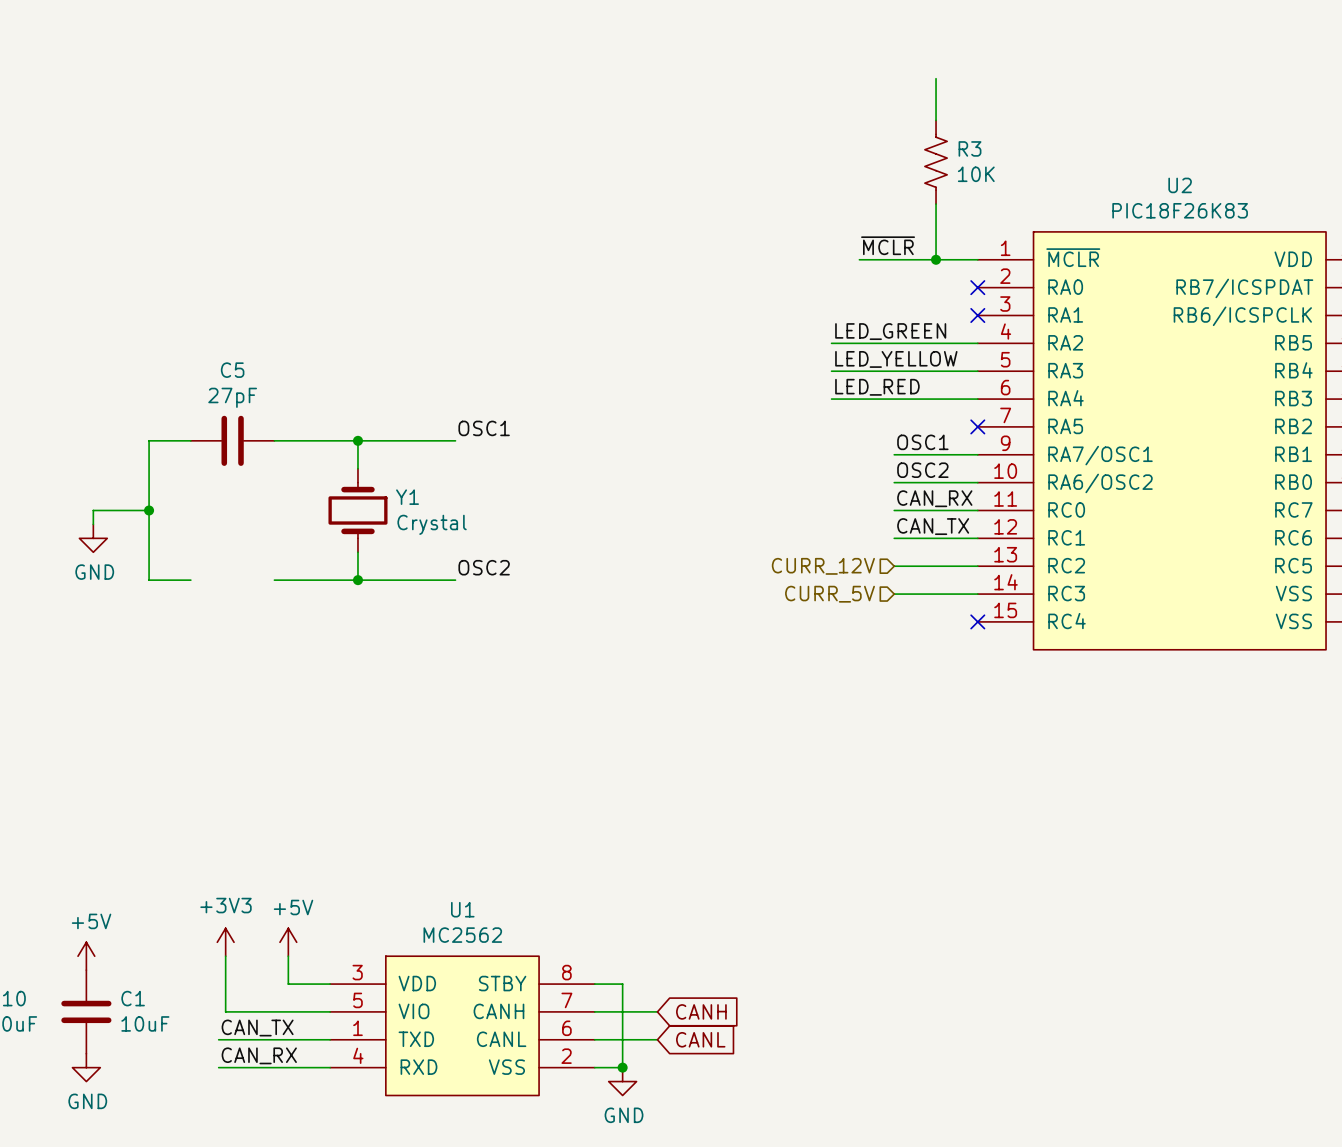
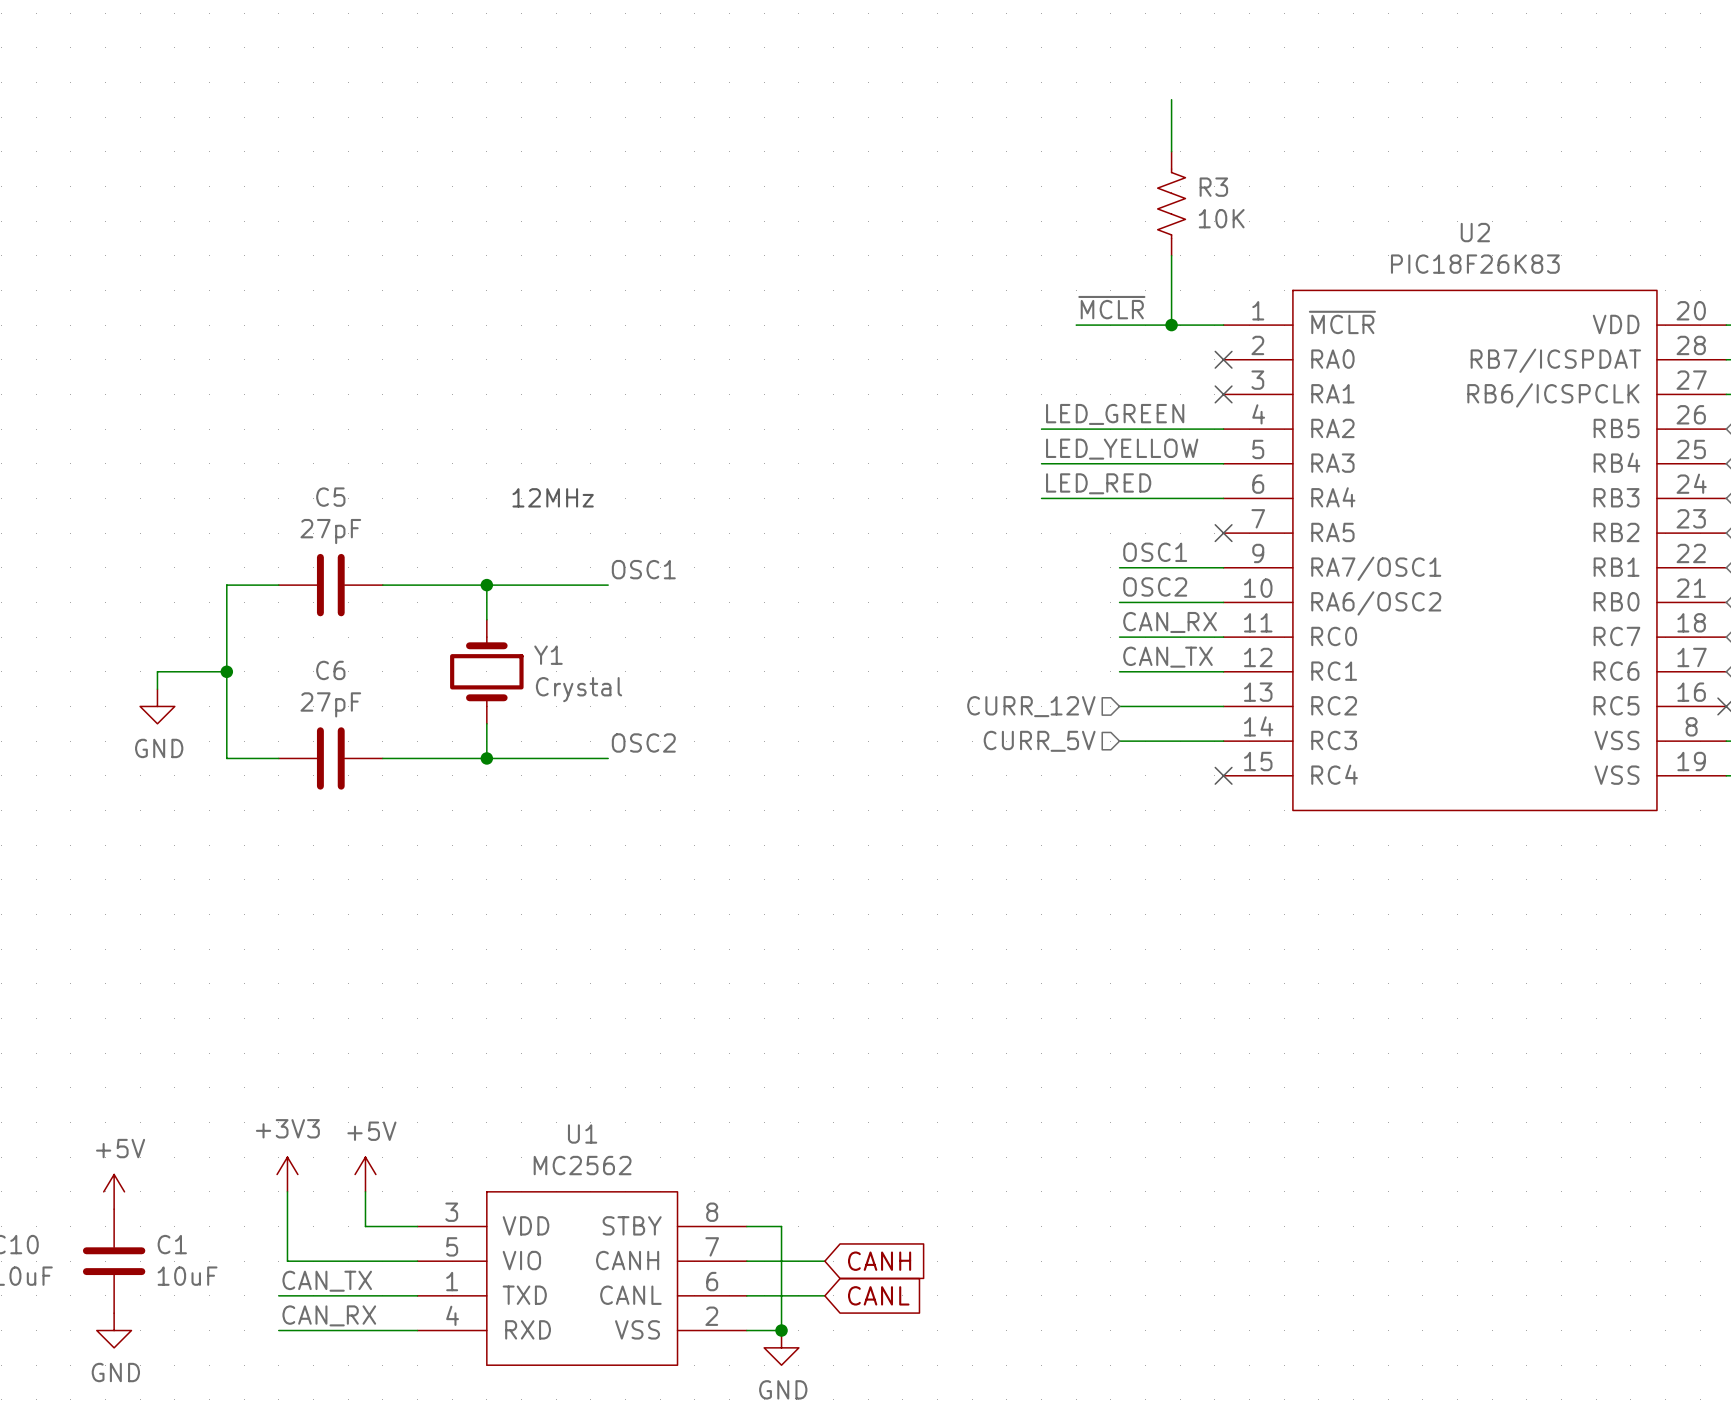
text: none -> 12MHz (553, 497)
label position: OSC1 (484, 428) -> OSC1 (643, 569)
wire: (190, 440) (149, 440) (149, 580) (190, 580) -> (278, 585) (226, 585) (226, 758) (278, 758)
C5 position: (232, 440) -> (330, 585)
wire: (274, 440) (455, 440) -> (382, 585) (608, 585)
wire: (357, 440) (357, 468) -> (486, 585) (486, 619)
junction position: (357, 440) -> (486, 585)
wire: (149, 510) (93, 510) (93, 524) -> (226, 671) (157, 671) (157, 689)
junction position: (149, 510) -> (226, 671)
Y1 position: (357, 510) -> (486, 671)
power symbol position: GND (93, 538) -> GND (157, 706)
wire: (357, 552) (357, 580) -> (486, 723) (486, 758)
label position: OSC2 (484, 567) -> OSC2 (643, 742)
wire: (274, 580) (455, 580) -> (382, 758) (608, 758)
junction position: (357, 580) -> (486, 758)
C6: none -> 27pF (330, 758)

